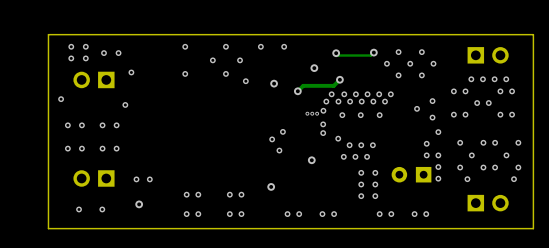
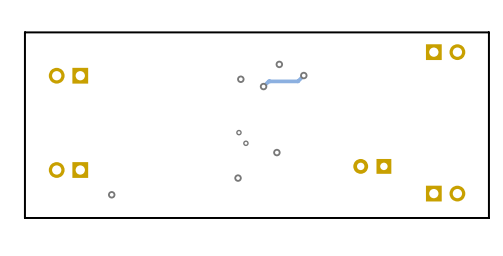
via: (71, 46) -> none
via: (85, 46) -> none
via: (185, 46) -> none
via: (225, 46) -> none
via: (260, 46) -> none
via: (284, 46) -> none
track: (373, 52) (370, 55) (338, 55) (336, 53) -> none
via: (373, 52) -> none
via: (398, 52) -> none
via: (421, 52) -> none
via: (104, 53) -> none
via: (118, 53) -> none
via: (336, 53) -> none
via: (71, 58) -> none
via: (85, 58) -> none
via: (212, 60) -> none
via: (240, 60) -> none
via: (386, 63) -> none
via: (410, 63) -> none
via: (433, 63) -> none
via: (131, 72) -> none
via: (185, 73) -> none
via: (225, 73) -> none
via: (398, 75) -> none
via: (421, 75) -> none
via: (471, 79) -> none
via: (482, 79) -> none
via: (494, 79) -> none
via: (506, 79) -> none
via: (245, 81) -> none
via: (453, 91) -> none
via: (465, 91) -> none
via: (500, 91) -> none
via: (512, 91) -> none
via: (331, 94) -> none
via: (344, 94) -> none
via: (355, 94) -> none
via: (367, 94) -> none
via: (379, 94) -> none
via: (390, 94) -> none
via: (61, 99) -> none
via: (326, 101) -> none
via: (338, 101) -> none
via: (350, 101) -> none
via: (361, 101) -> none
via: (373, 101) -> none
via: (385, 101) -> none
via: (432, 101) -> none
via: (477, 103) -> none
via: (488, 103) -> none
via: (125, 104) -> none
via: (417, 108) -> none
via: (323, 110) -> none
via: (307, 113) -> none
via: (312, 113) -> none
via: (317, 113) -> none
via: (453, 114) -> none
via: (465, 114) -> none
via: (500, 114) -> none
via: (512, 114) -> none
via: (342, 115) -> none
via: (360, 115) -> none
via: (379, 115) -> none
via: (432, 117) -> none
via: (323, 124) -> none
via: (67, 125) -> none
via: (81, 125) -> none
via: (102, 125) -> none
via: (116, 125) -> none
via: (282, 131) -> none
via: (438, 132) -> none
via: (323, 133) -> none
via: (338, 138) -> none
via: (460, 142) -> none
via: (483, 142) -> none
via: (495, 142) -> none
via: (518, 142) -> none
via: (426, 143) -> none
via: (349, 145) -> none
via: (361, 145) -> none
via: (372, 145) -> none
via: (67, 148) -> none
via: (81, 148) -> none
via: (102, 148) -> none
via: (116, 148) -> none
via: (426, 155) -> none
via: (438, 155) -> none
via: (471, 155) -> none
via: (506, 155) -> none
via: (343, 156) -> none
via: (355, 156) -> none
via: (367, 156) -> none
via: (438, 167) -> none
via: (460, 167) -> none
via: (483, 167) -> none
via: (495, 167) -> none
via: (518, 167) -> none
via: (361, 172) -> none
via: (375, 172) -> none
via: (438, 178) -> none
via: (136, 179) -> none
via: (149, 179) -> none
via: (467, 179) -> none
via: (514, 179) -> none
via: (361, 184) -> none
via: (375, 184) -> none
via: (186, 194) -> none
via: (198, 194) -> none
via: (229, 194) -> none
via: (241, 194) -> none
via: (361, 196) -> none
via: (375, 196) -> none
via: (79, 209) -> none
via: (102, 209) -> none
via: (186, 214) -> none
via: (198, 214) -> none
via: (229, 214) -> none
via: (241, 214) -> none
via: (287, 214) -> none
via: (299, 214) -> none
via: (322, 214) -> none
via: (334, 214) -> none
via: (379, 214) -> none
via: (391, 214) -> none
via: (414, 214) -> none
via: (426, 214) -> none

